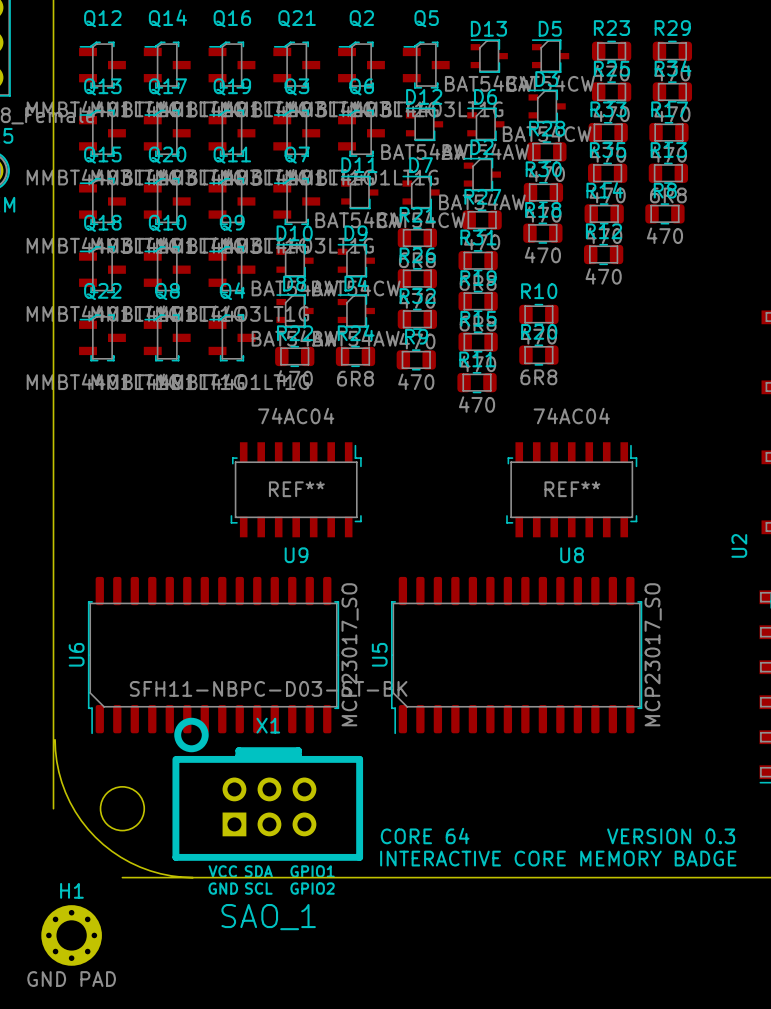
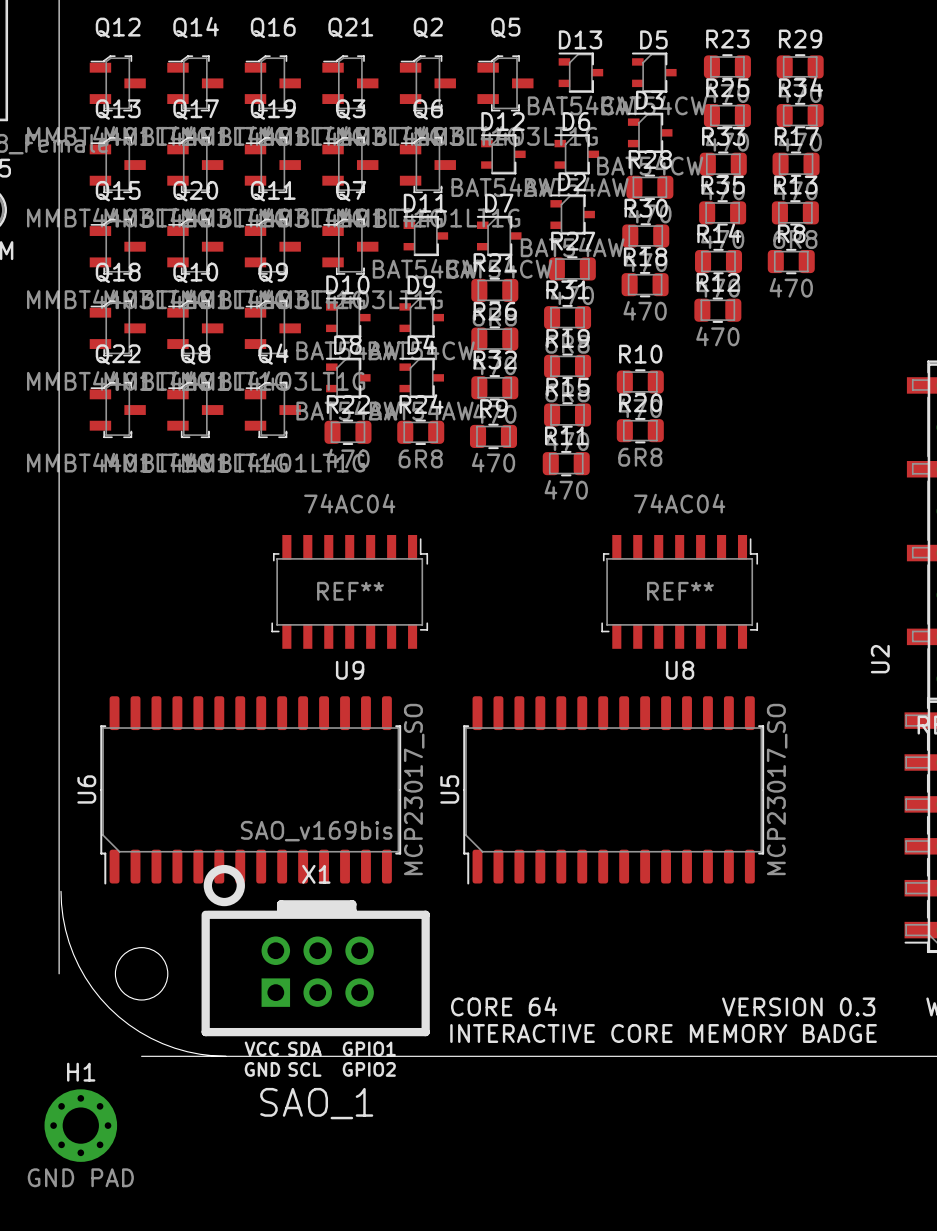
X1 value: SFH11-NBPC-D03-ST-BK (268, 688) -> SAO_v169bis (316, 831)

